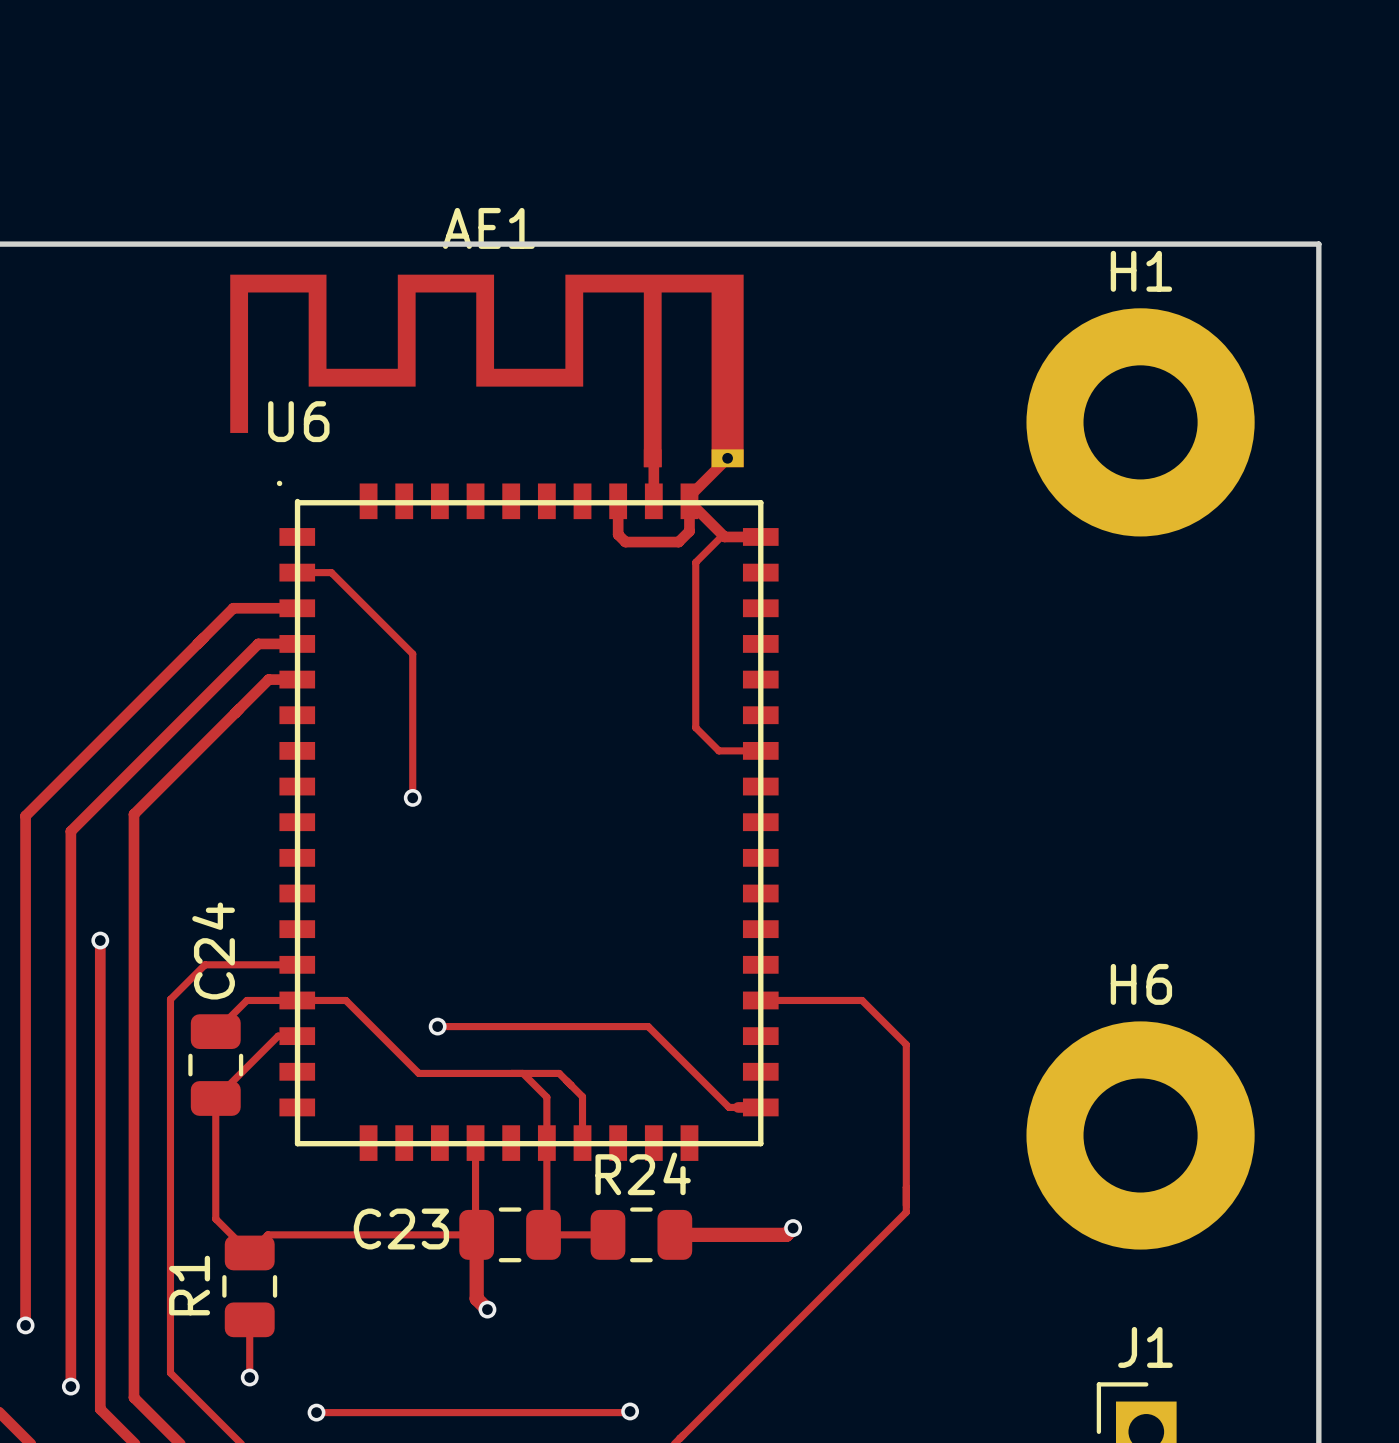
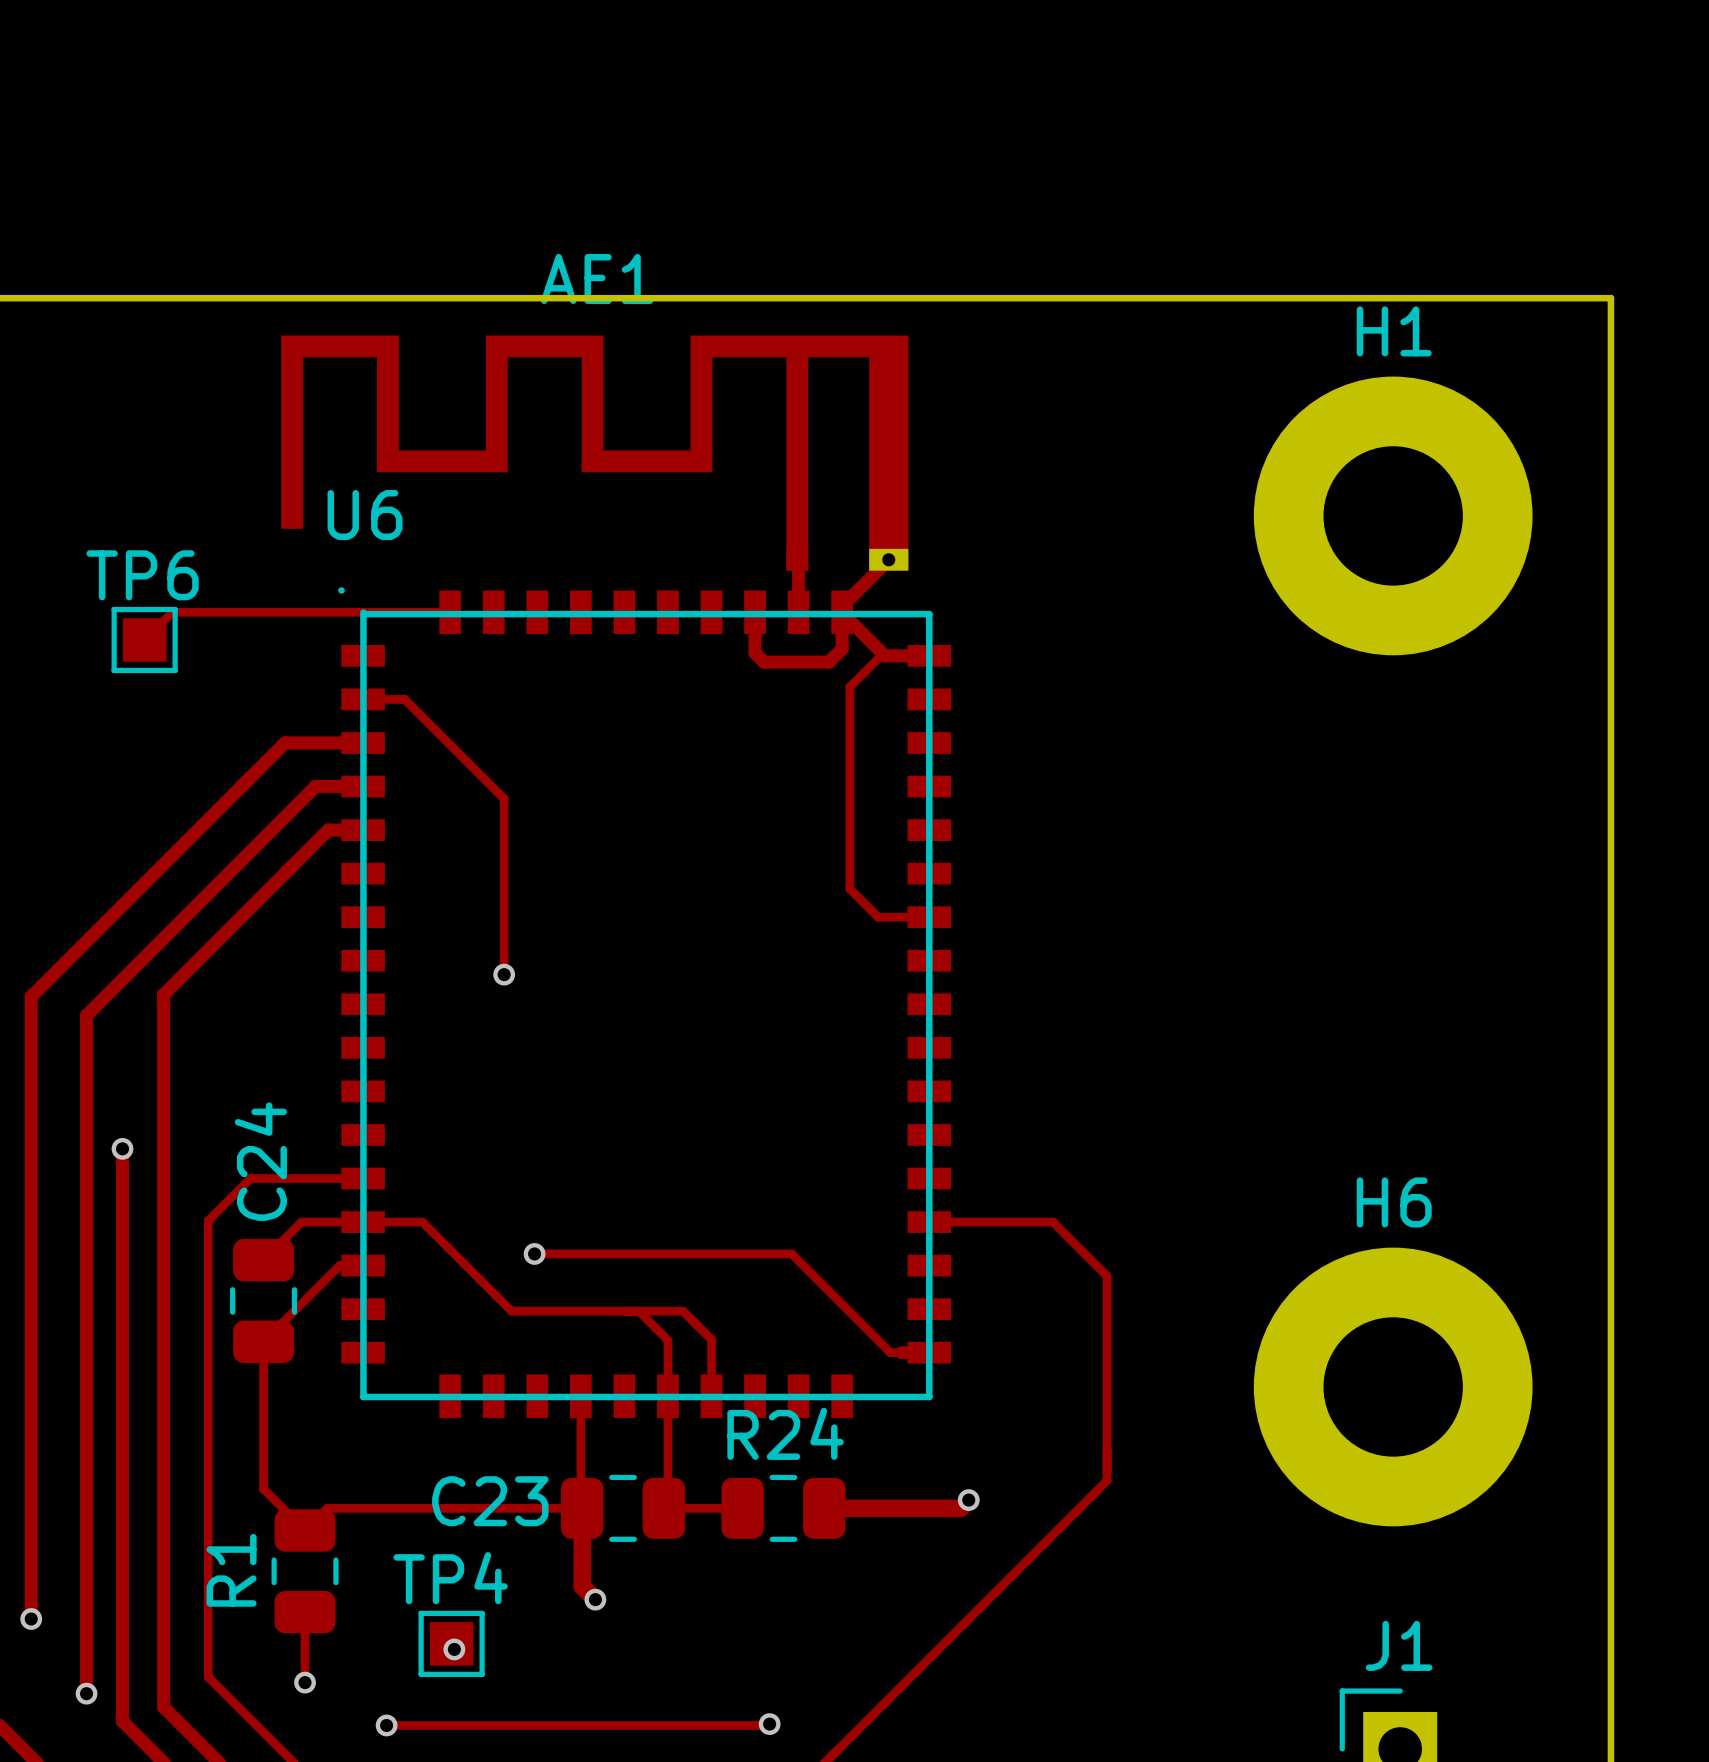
track: none -> (450, 612) (172, 612) (144, 639)
TP6: none -> (144, 639)
TP4: none -> (451, 1643)
via: none -> (454, 1649)

